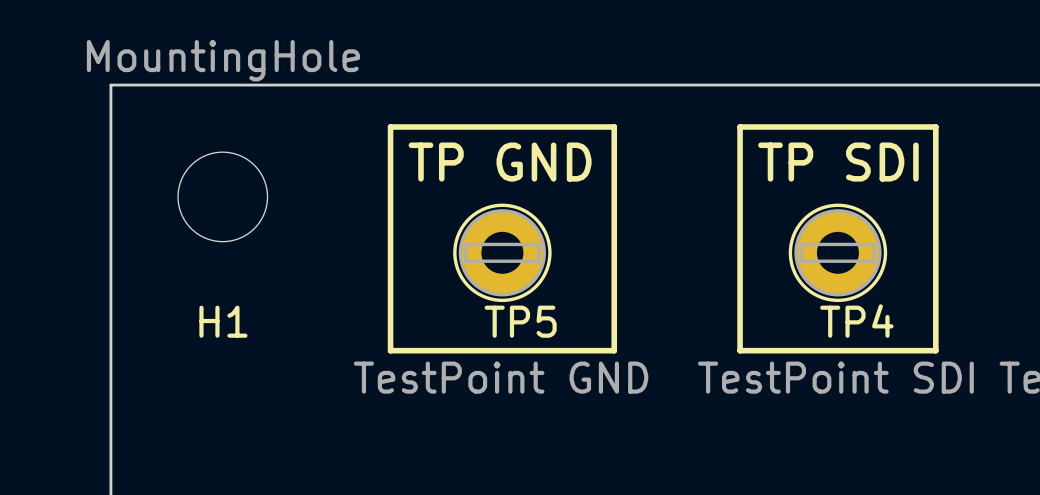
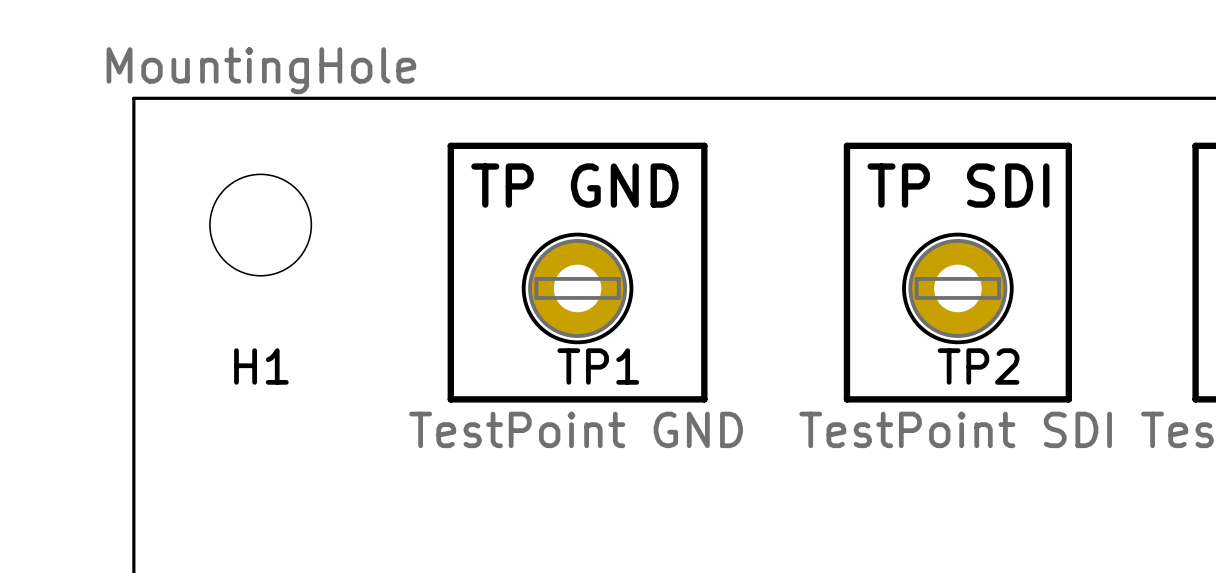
TP5 name: TP5 (520, 321) -> TP1 (598, 366)
TP4 name: TP4 (856, 321) -> TP2 (978, 366)

